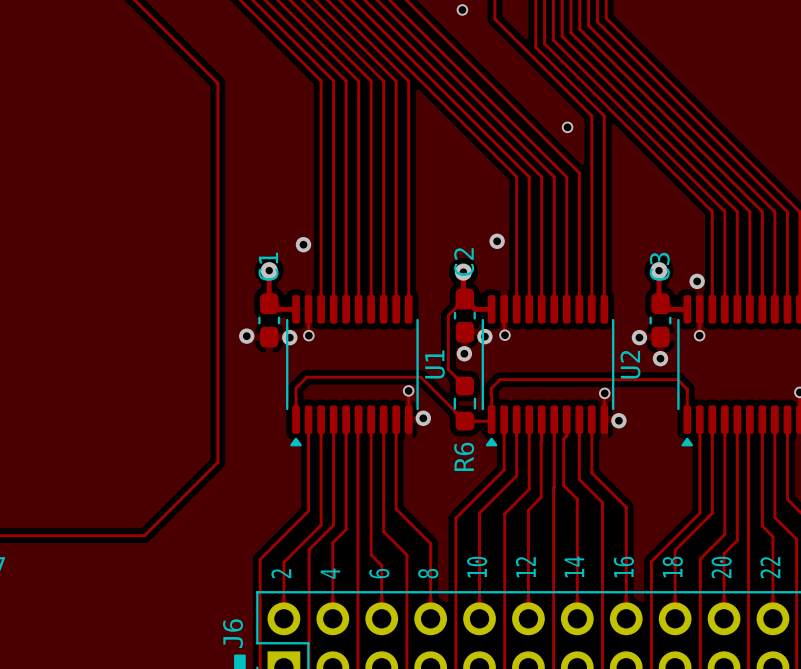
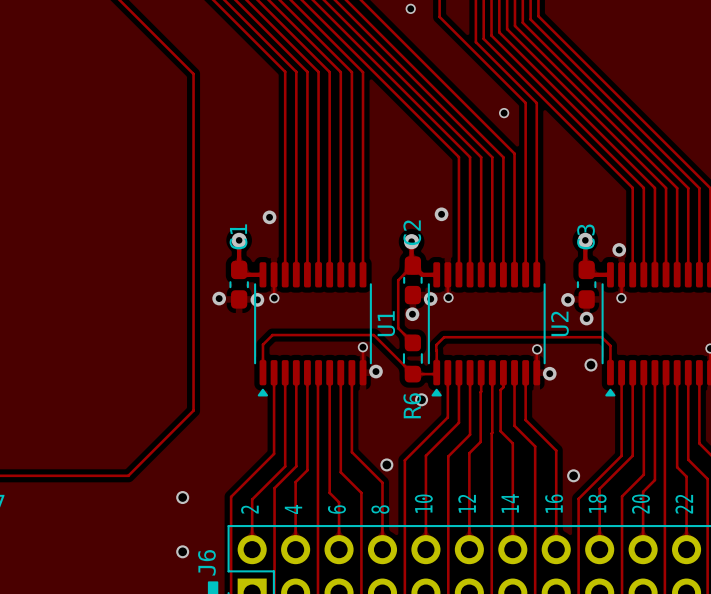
via: none -> (590, 365)
via: none -> (421, 399)
via: none -> (386, 464)
via: none -> (573, 475)
via: none -> (182, 497)
via: none -> (182, 551)

